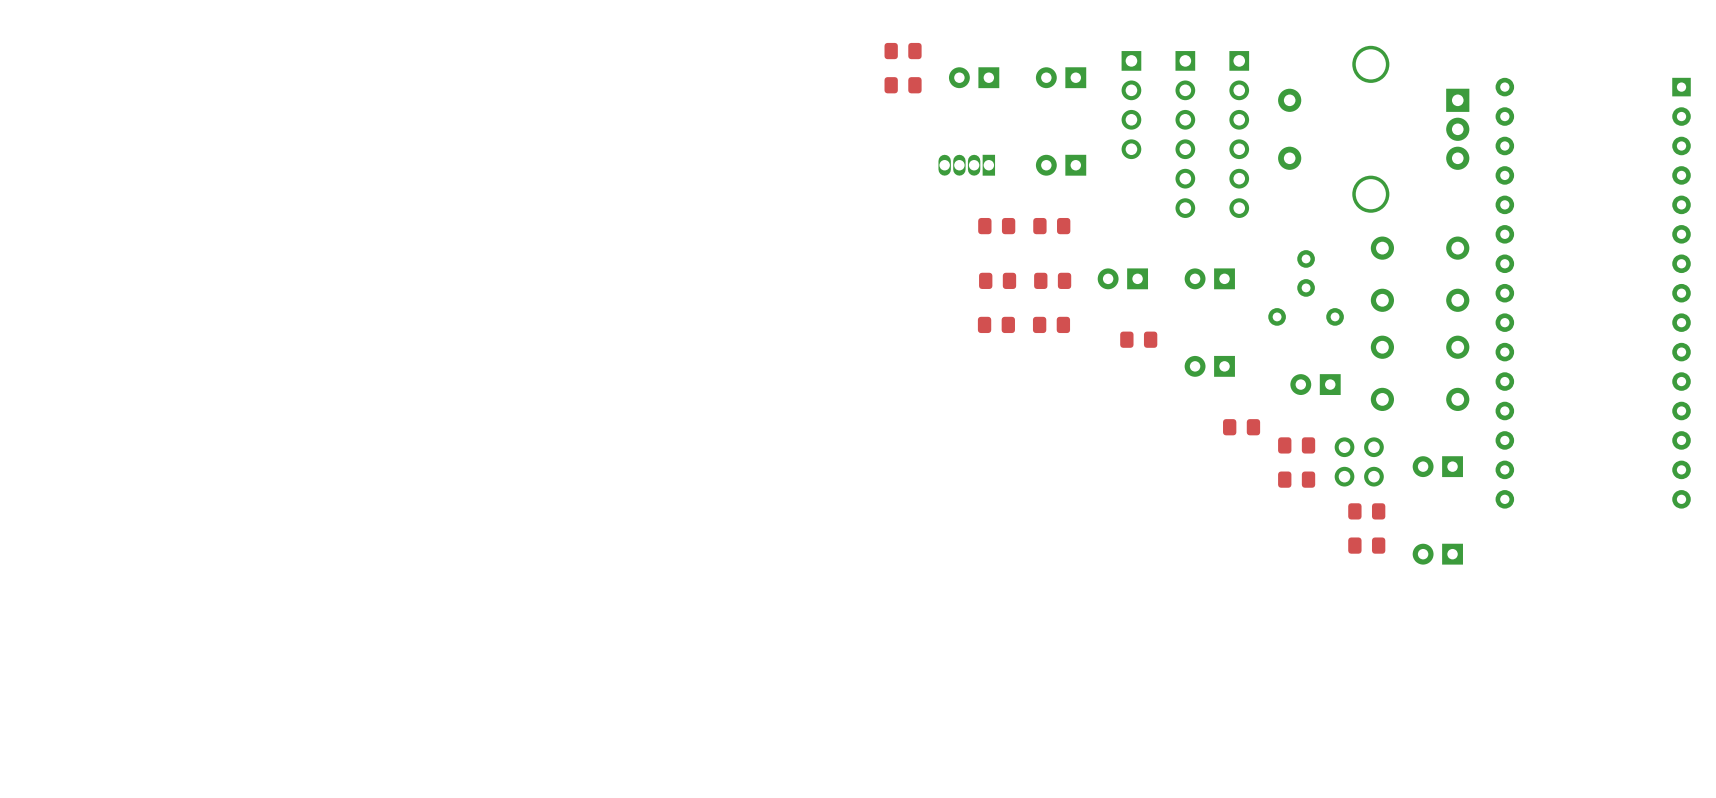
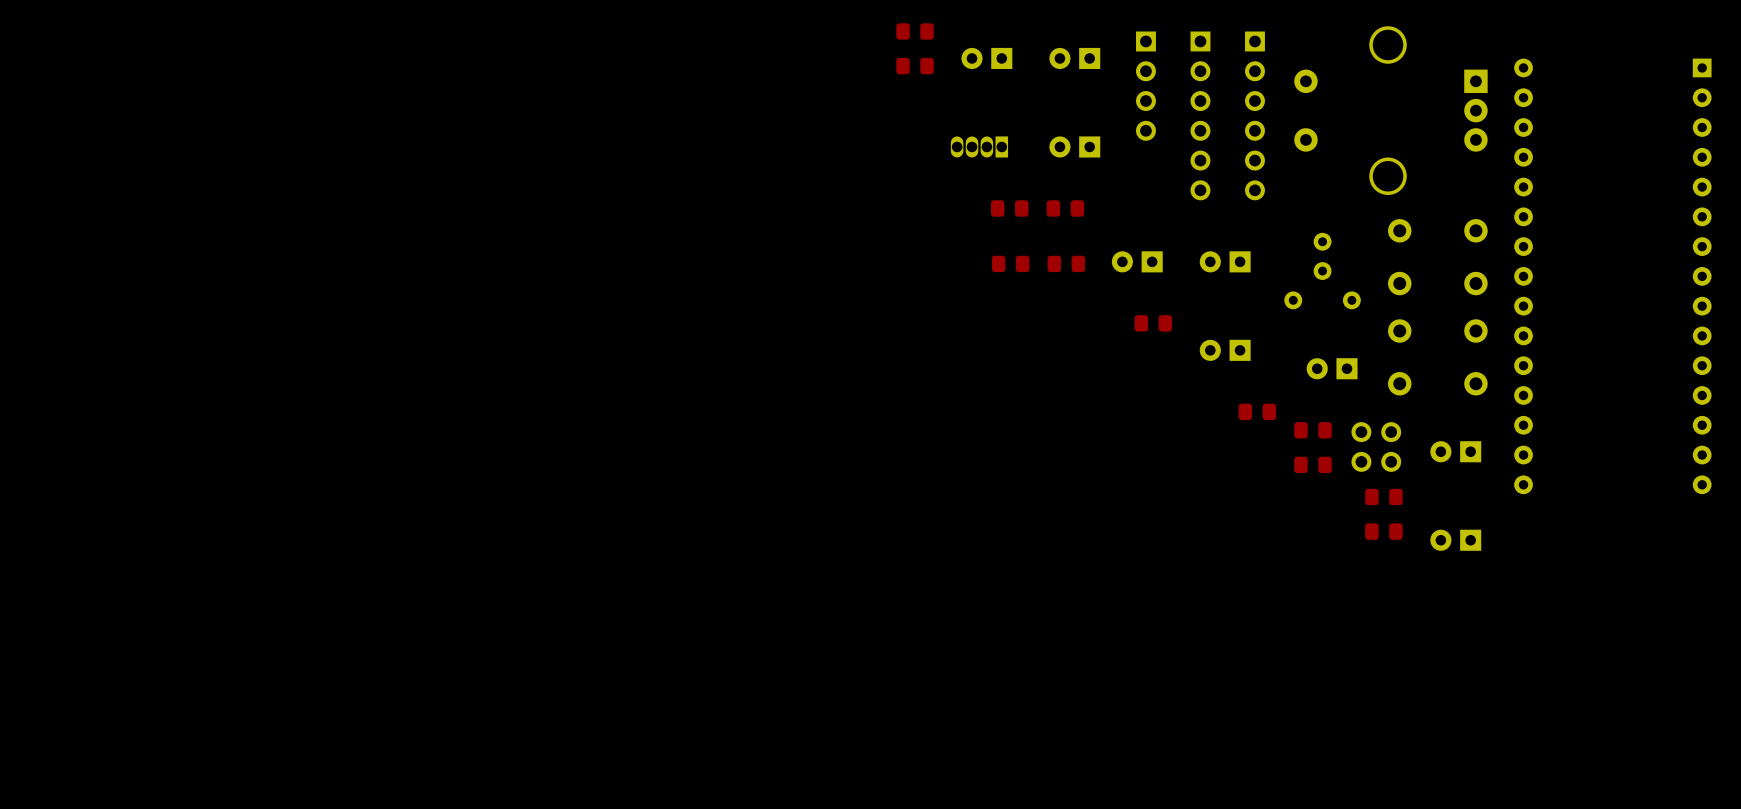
part: (996, 324) -> none
part: (1051, 324) -> none

